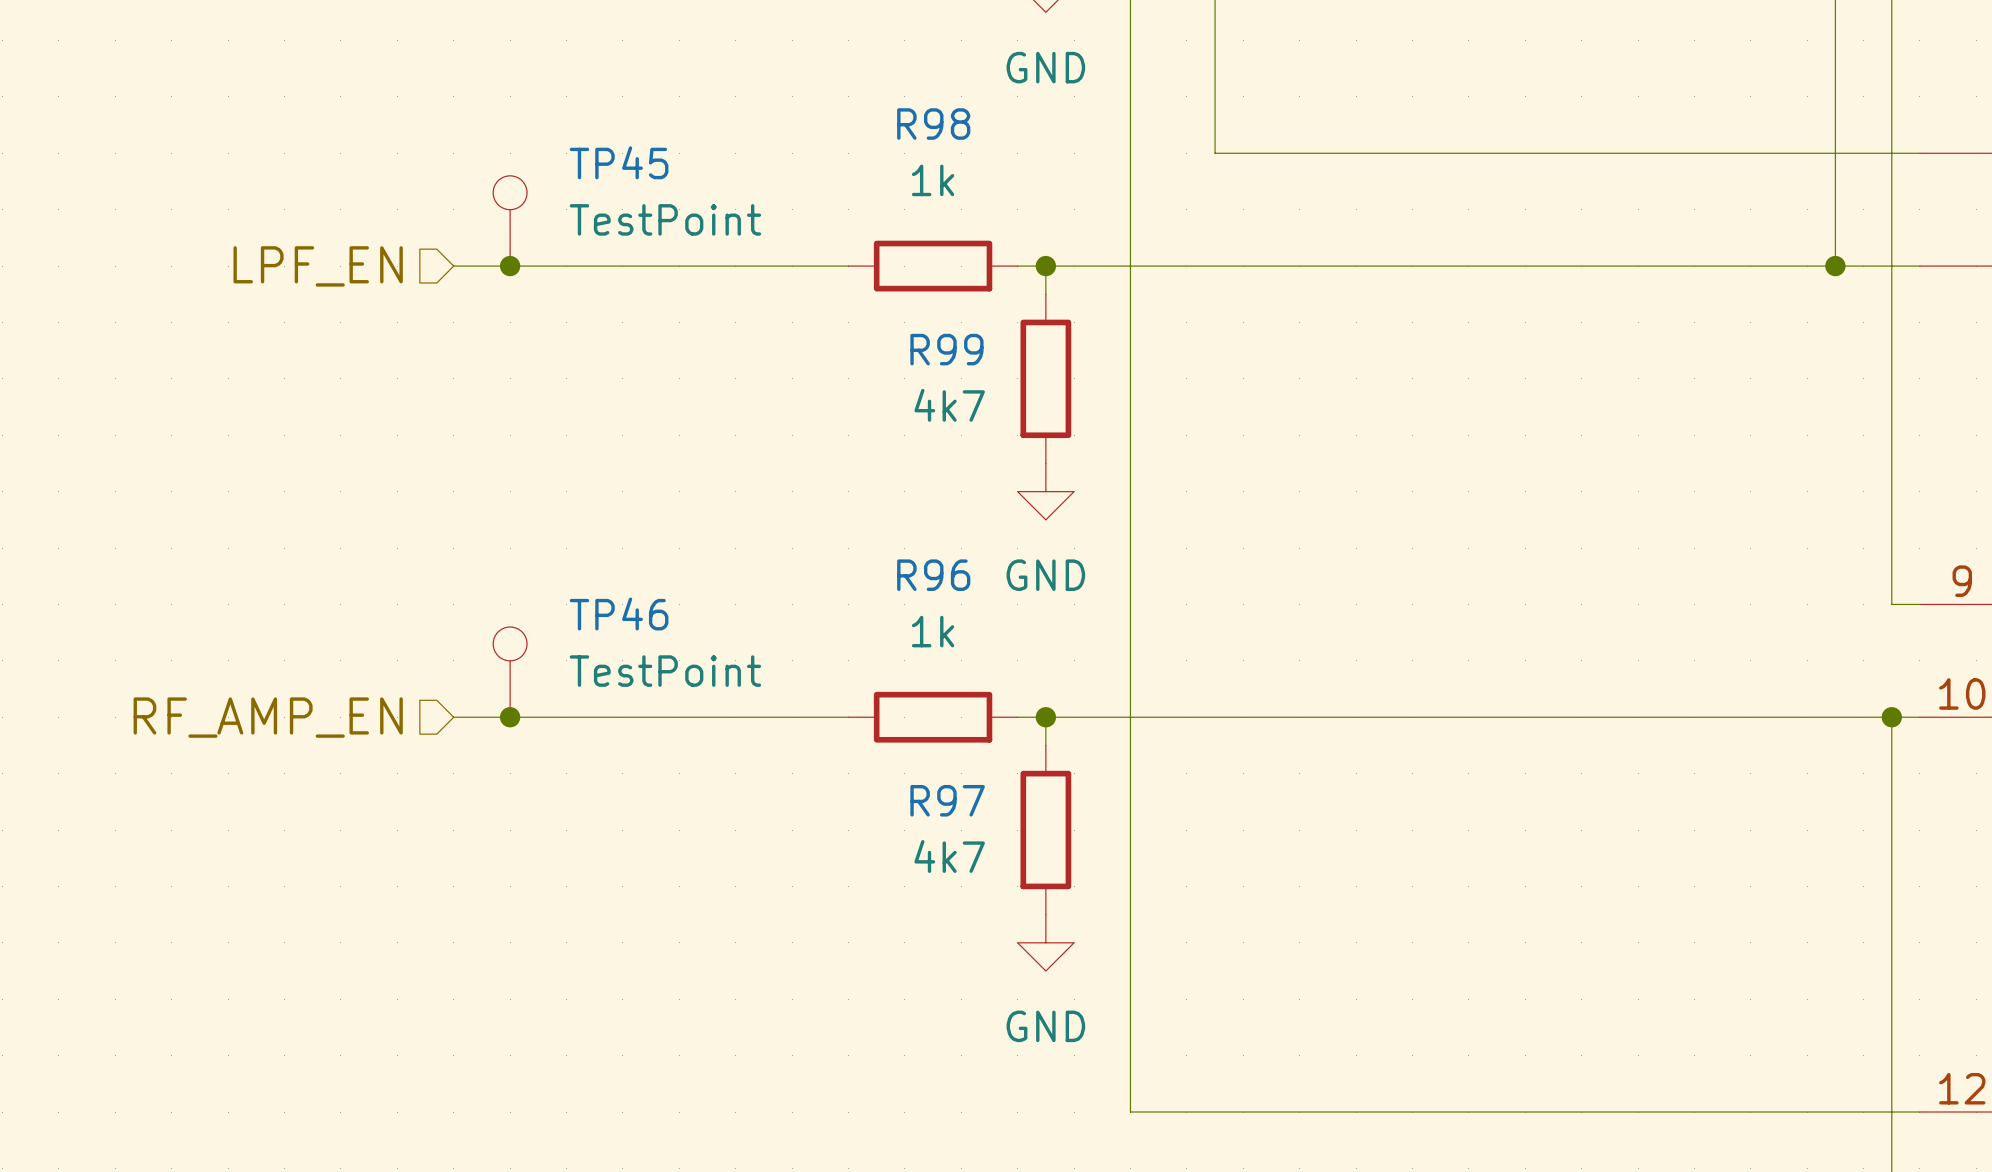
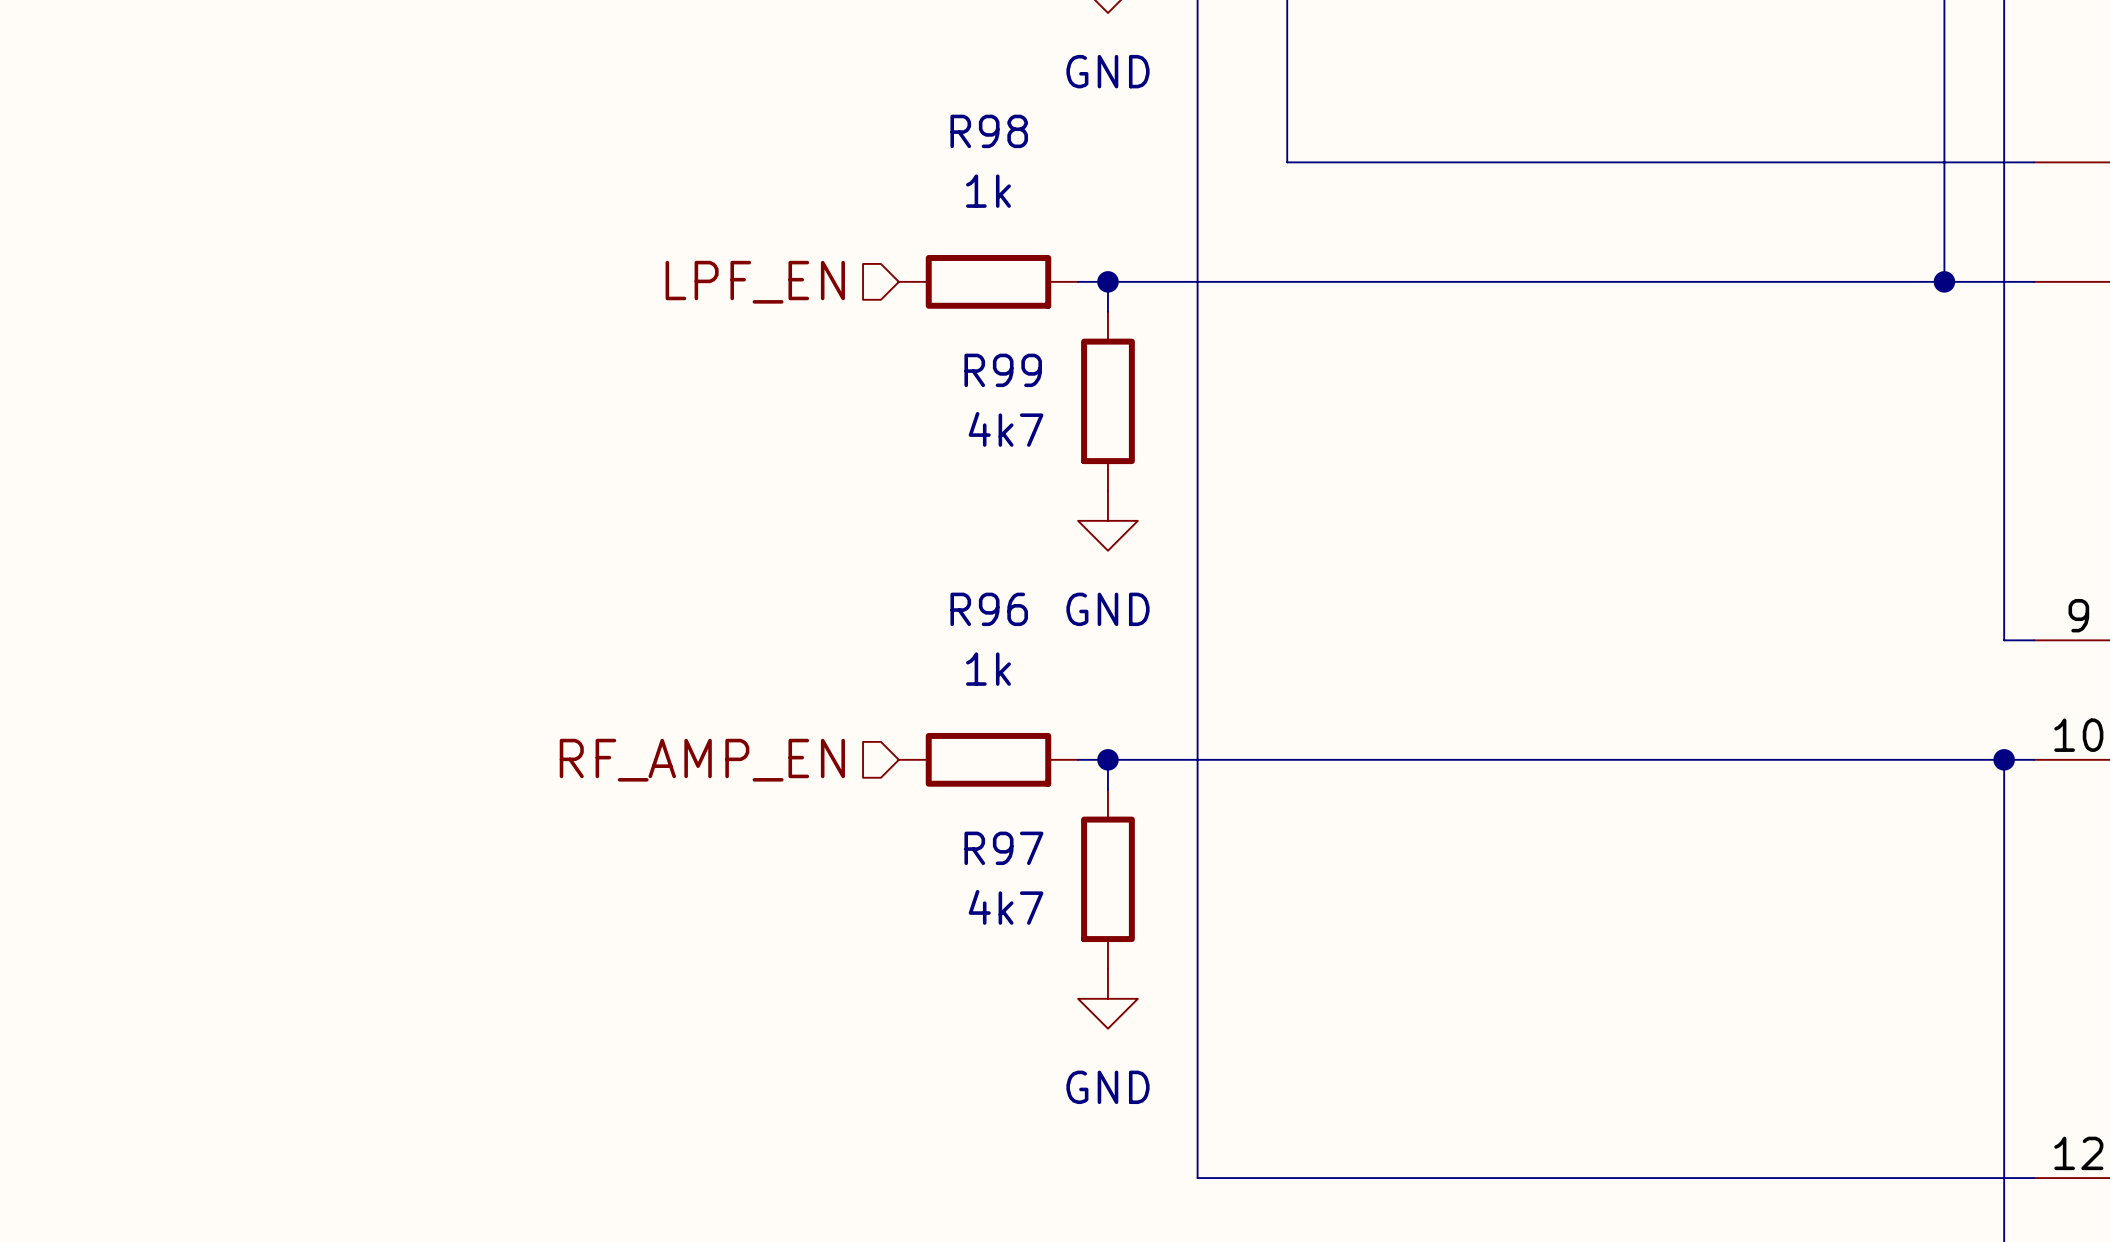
TP45: TestPoint (510, 220) -> none
hierarchical label position: LPF_EN (318, 266) -> LPF_EN (755, 282)
wire: (453, 266) (848, 266) -> none
junction: (510, 266) -> none
TP46: TestPoint (510, 672) -> none
hierarchical label position: RF_AMP_EN (268, 717) -> RF_AMP_EN (702, 760)
wire: (453, 717) (848, 717) -> none
junction: (510, 717) -> none

